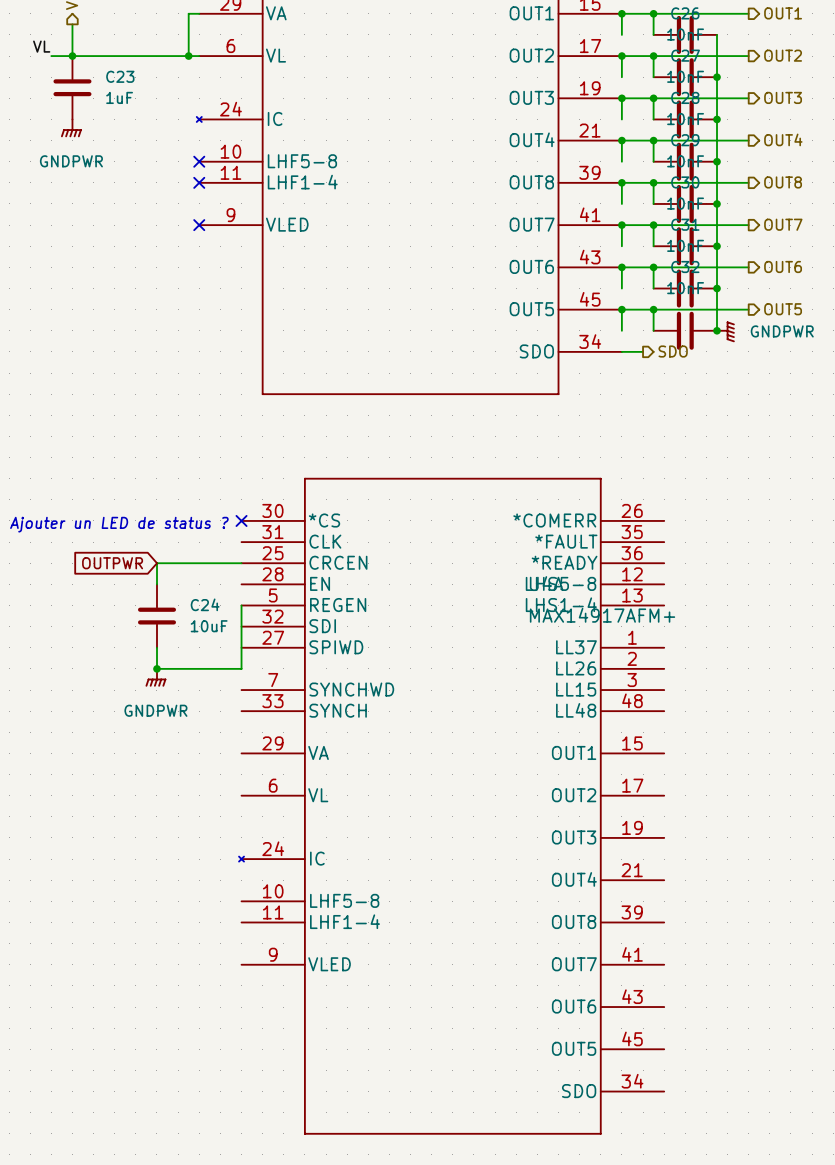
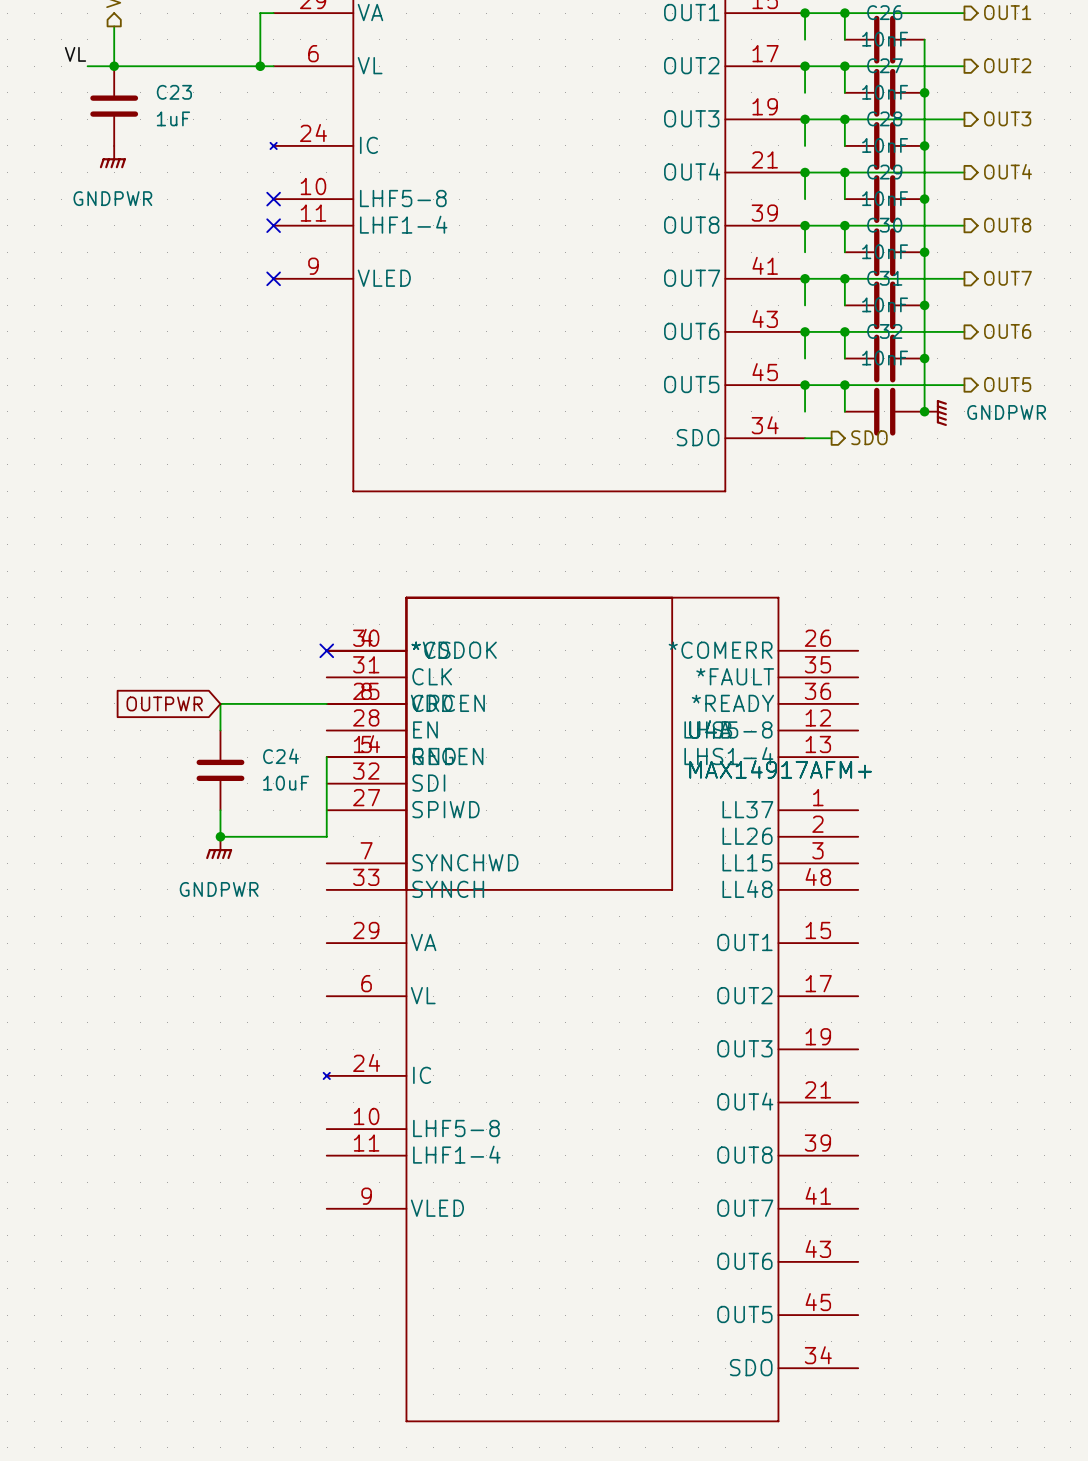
text: Ajouter un LED de status ? (119, 524) -> none
part: none -> MAX14917AFM+ (499, 743)

